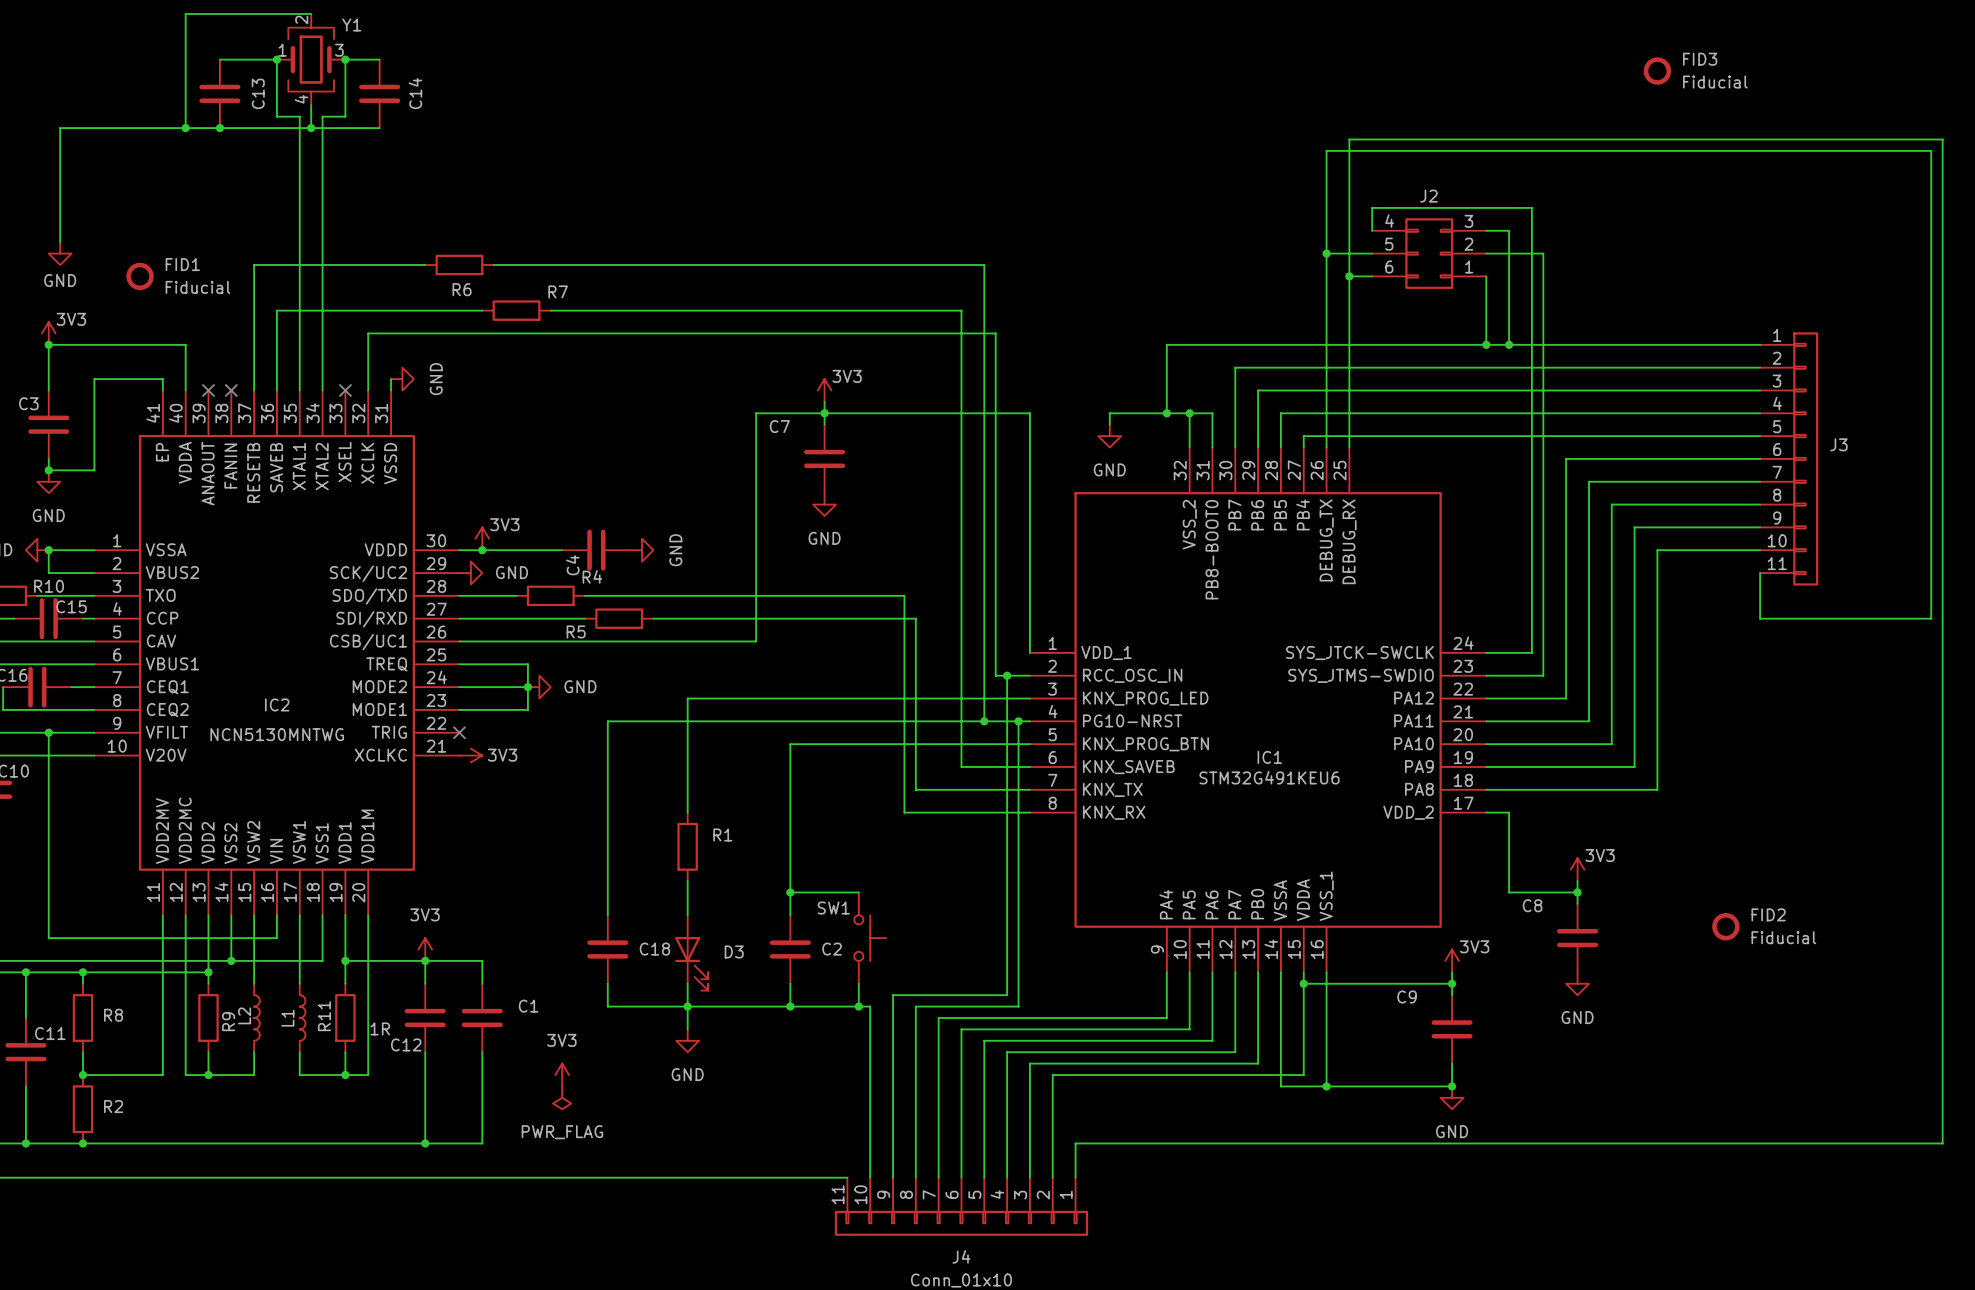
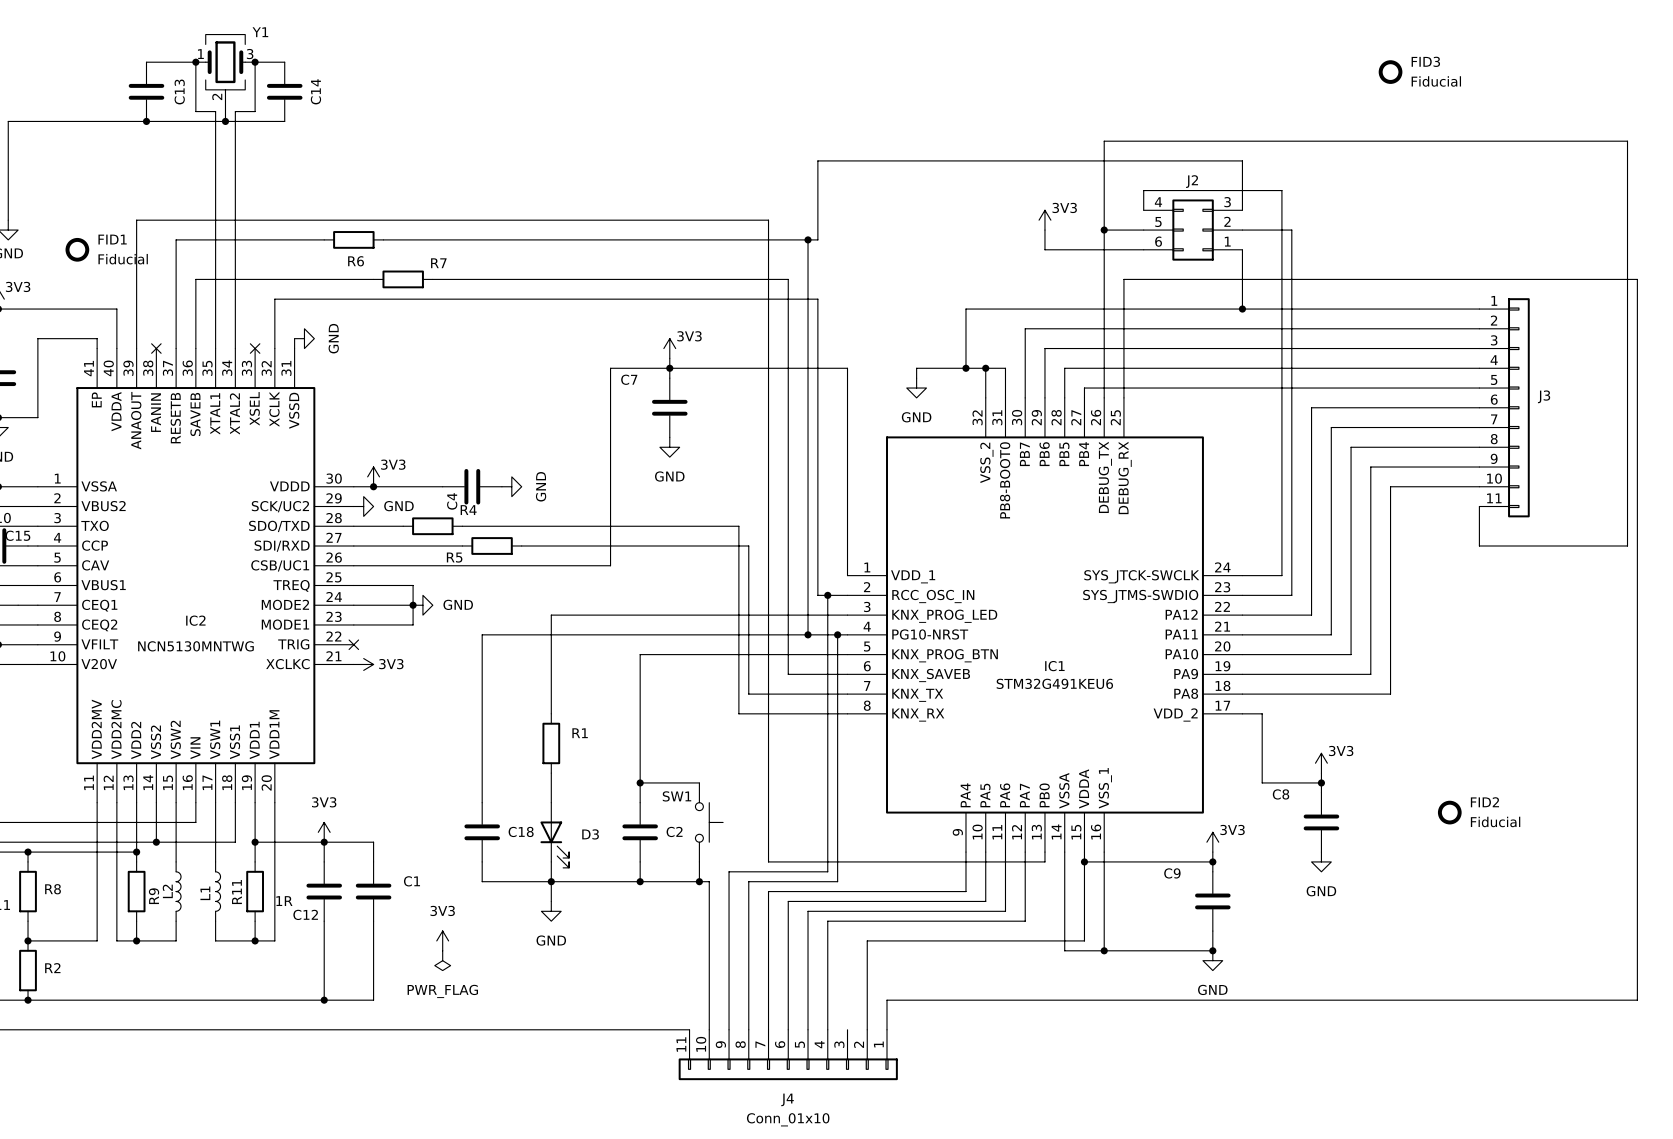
Y1 symbol: [276, 13, 346, 106] -> [195, 34, 256, 102]
wire: (311, 13) (185, 13) (185, 128) -> none
junction: (185, 128) -> none
wire: (1486, 230) (1509, 230) (1509, 344) -> (1242, 210) (1242, 160) (817, 160) (817, 239) (808, 239)
power symbol: none -> 3V3 (1044, 220)
wire: none -> (1044, 230) (1044, 249) (1123, 249)
junction: none -> (808, 239)
junction: (1349, 276) -> none
wire: (1349, 310) (1349, 139) (1942, 139) (1942, 310) -> (1123, 279) (1637, 279)
junction: (1509, 344) -> none
no-connect mark: (208, 390) -> none
wire: (1258, 983) (1258, 1063) (1029, 1063) (1029, 1177) -> (1044, 861) (768, 861) (768, 220) (136, 220) (136, 348)

